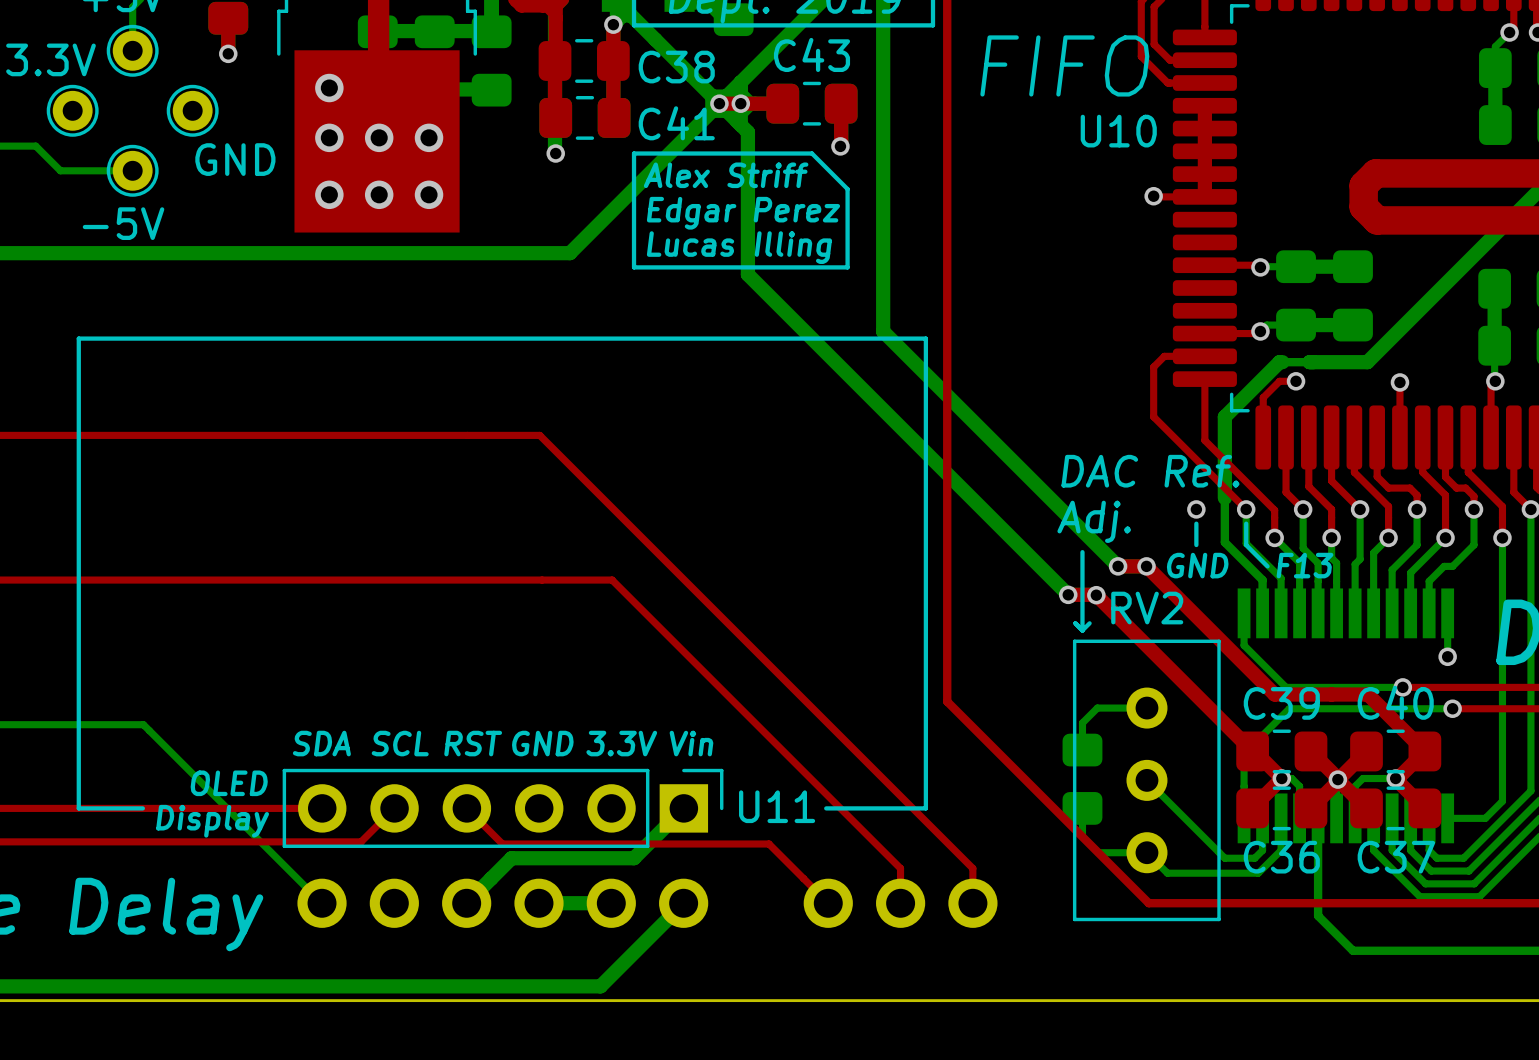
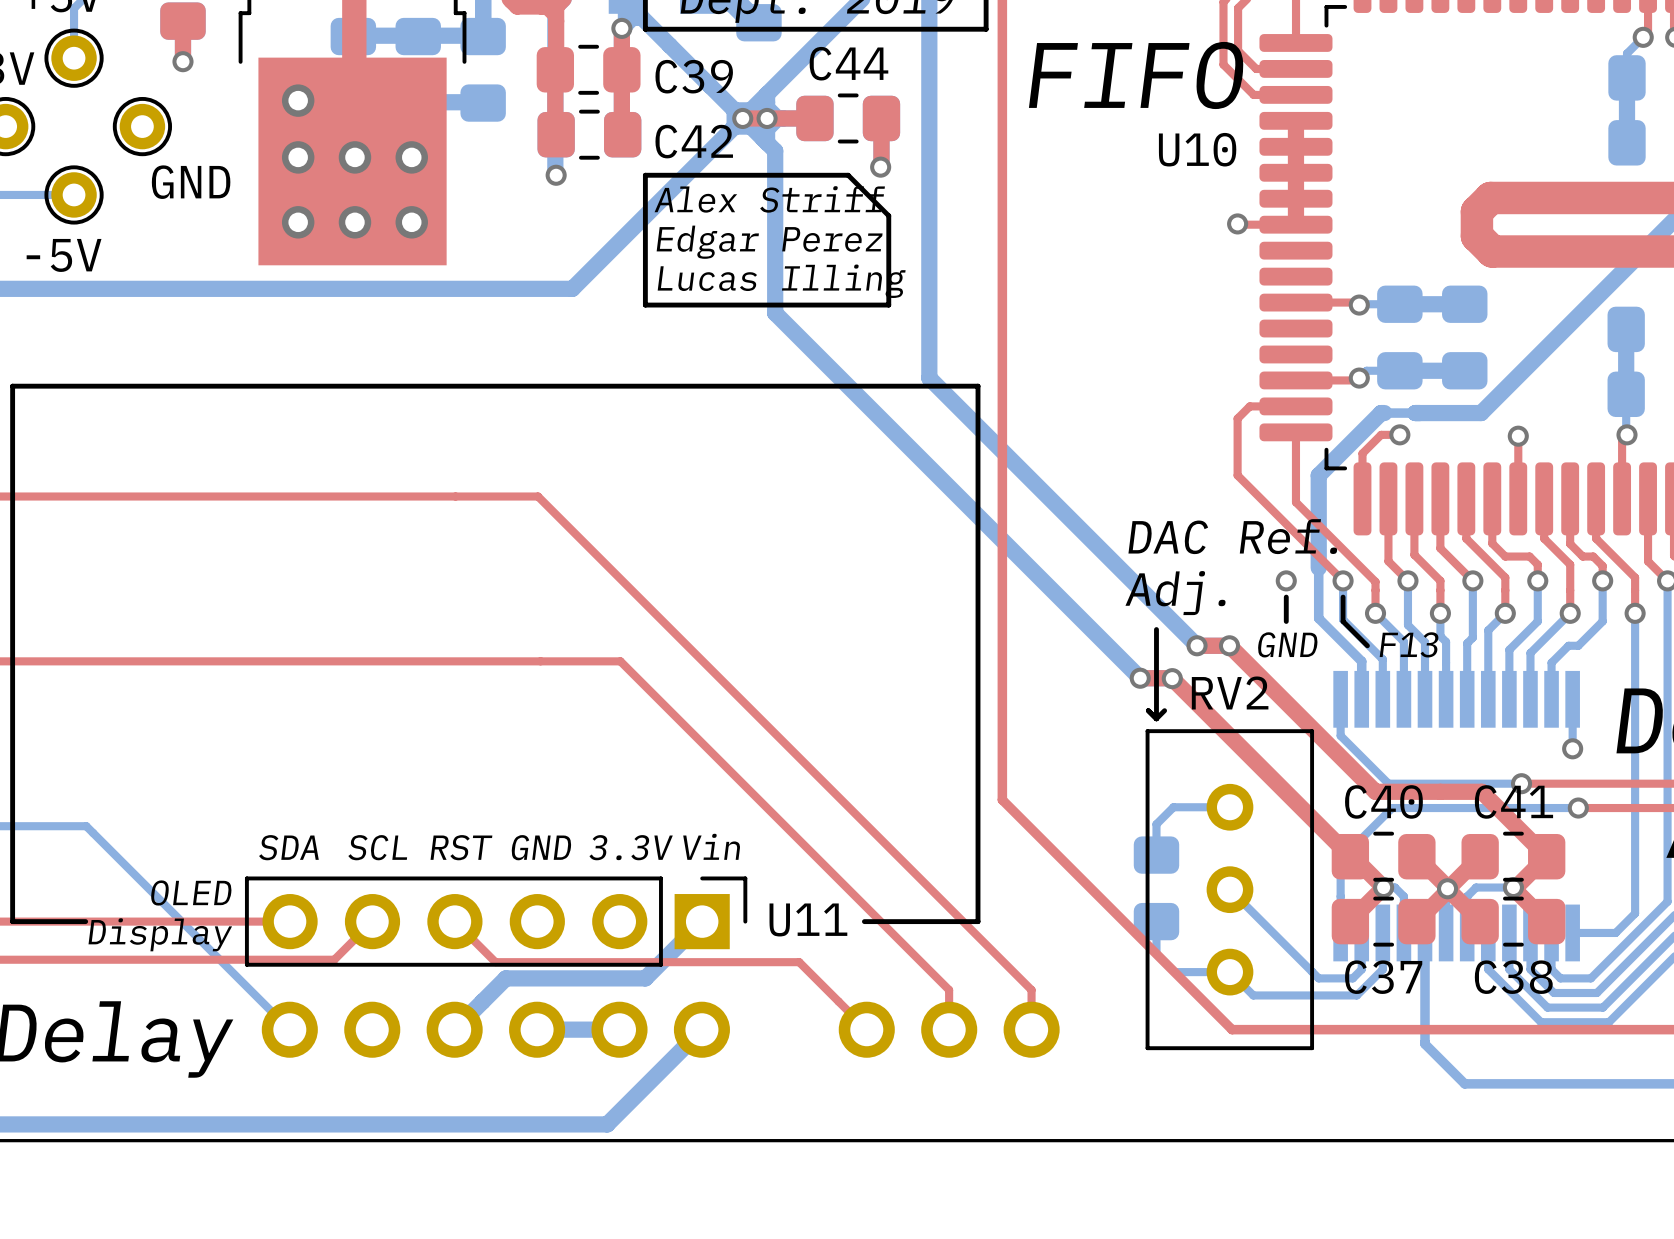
C43 name: C43 (811, 54) -> C44 (848, 63)
C38 name: C38 (676, 67) -> C39 (694, 76)
C41 name: C41 (676, 123) -> C42 (694, 141)
C40 name: C40 (1395, 702) -> C41 (1513, 801)
C39 name: C39 (1281, 703) -> C40 (1383, 801)
C36 name: C36 (1281, 857) -> C37 (1383, 977)
C37 name: C37 (1396, 857) -> C38 (1513, 977)

